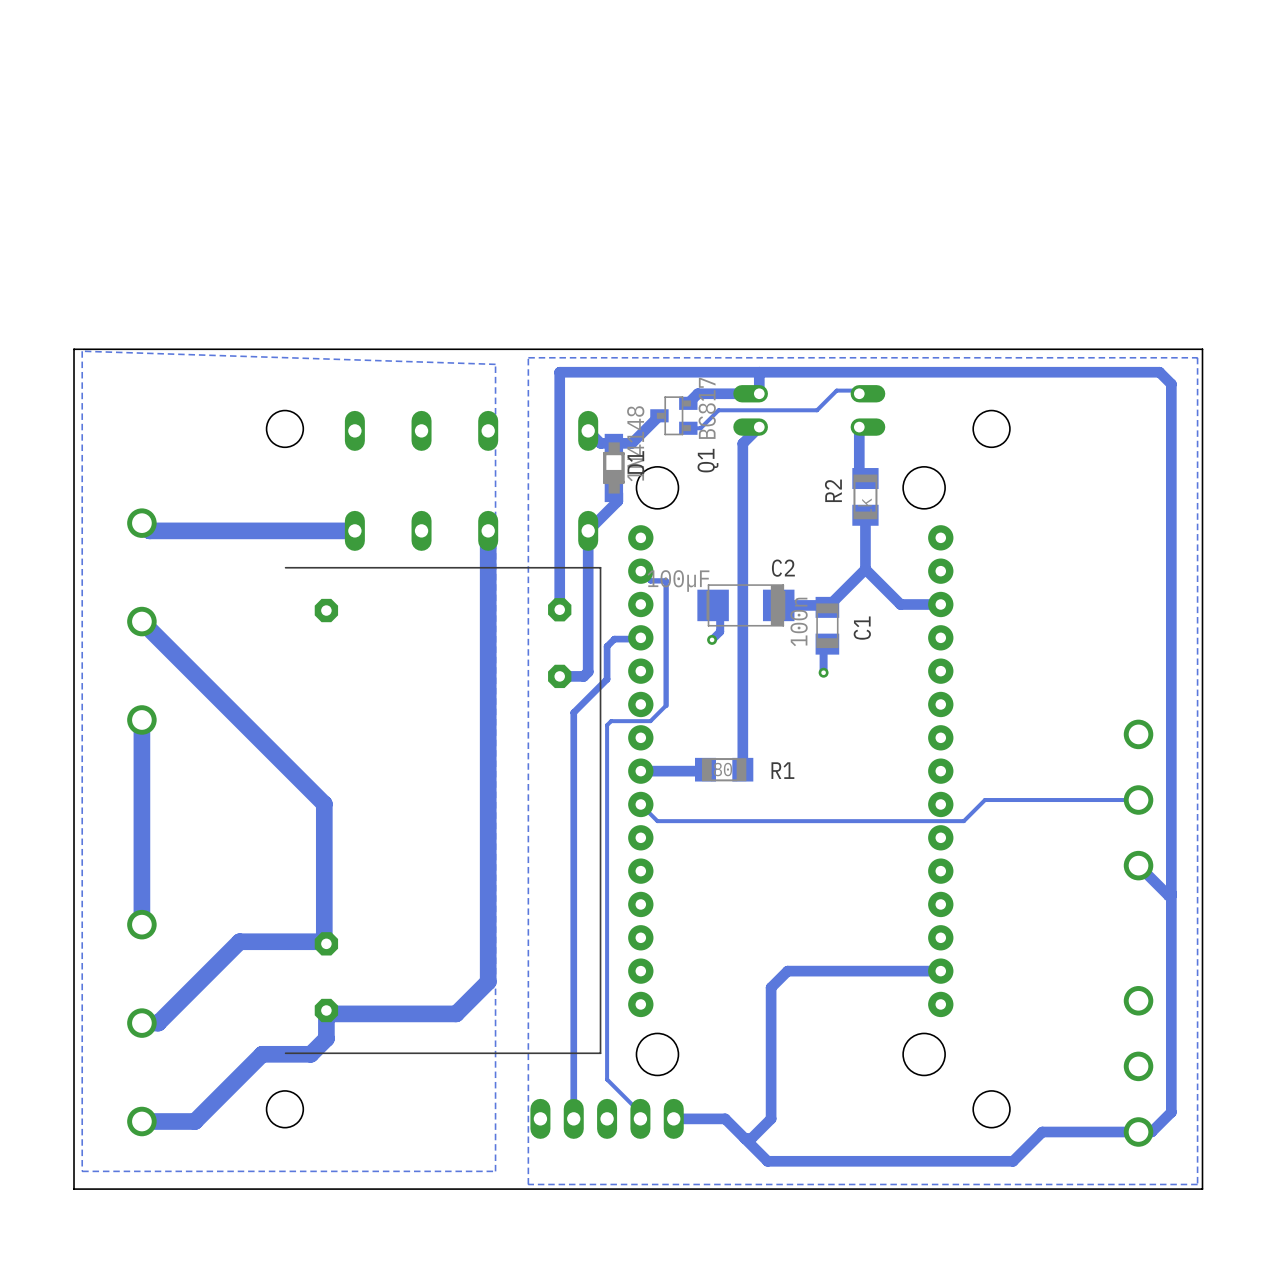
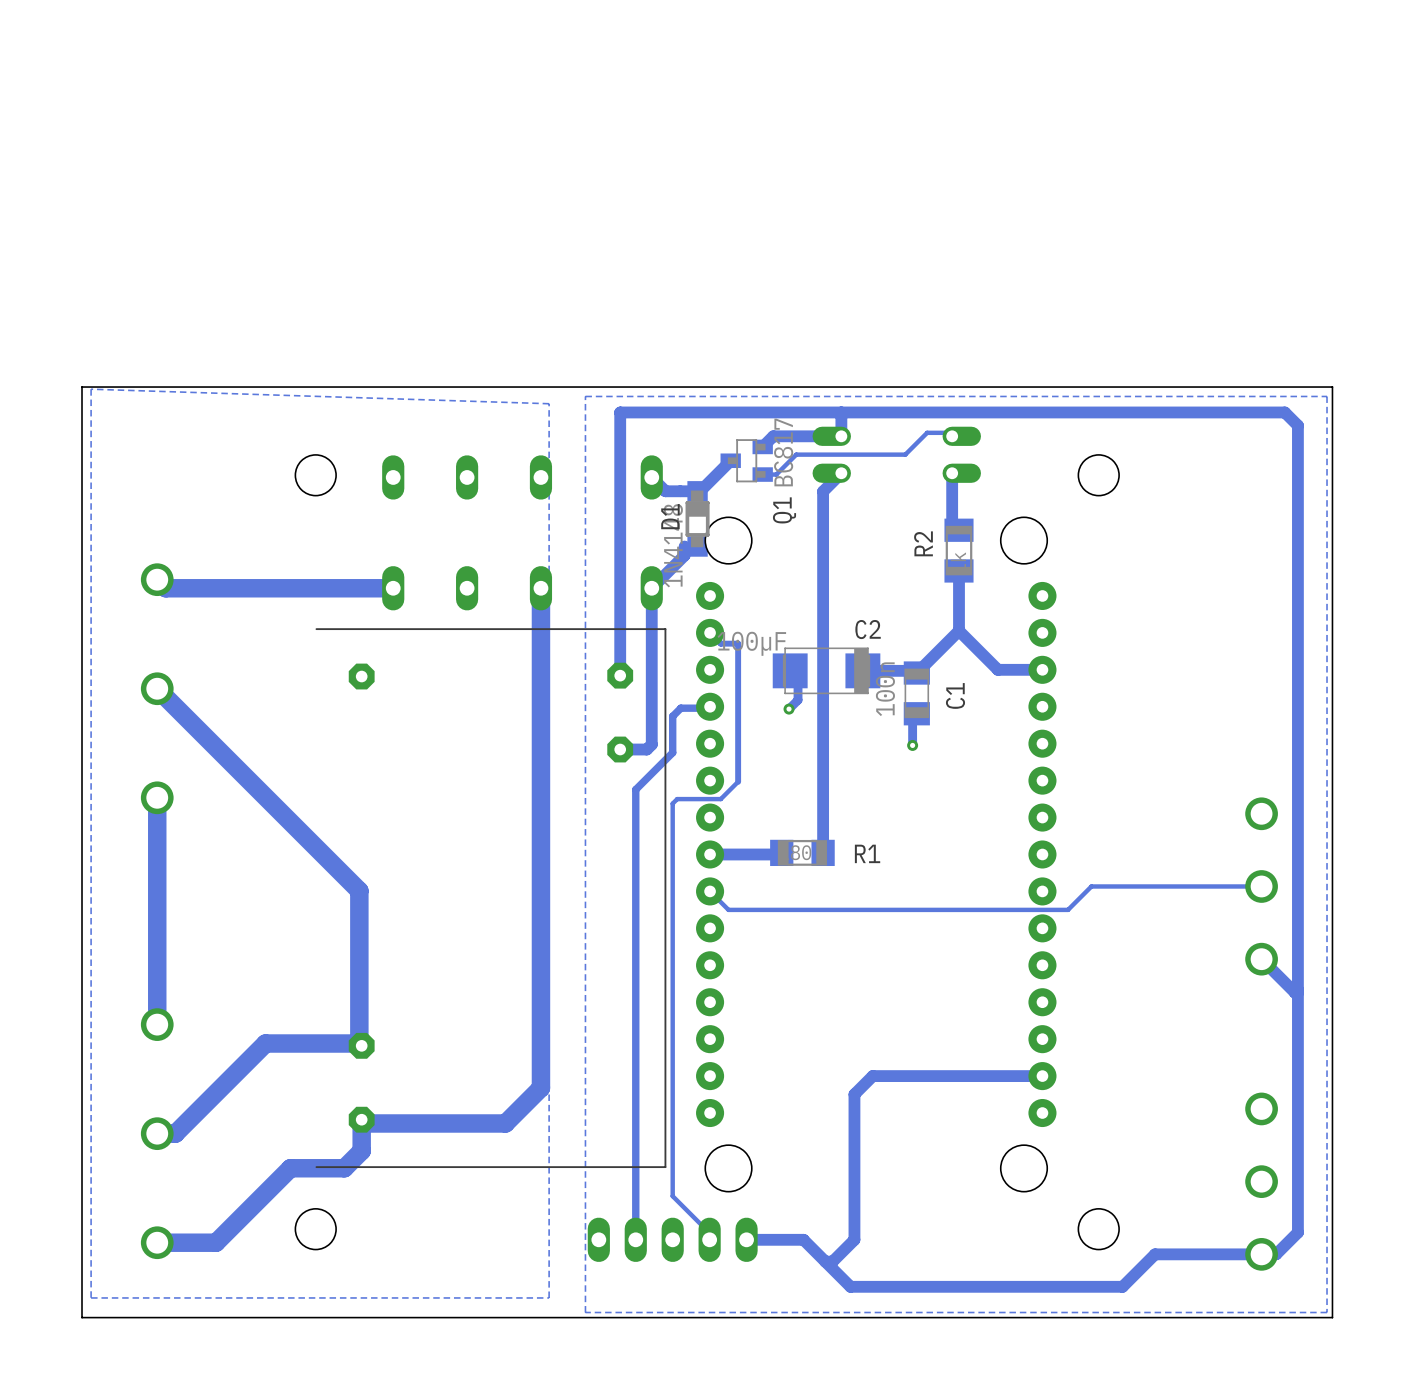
D1 rotation: 0° (613, 467) -> 180° (697, 518)

